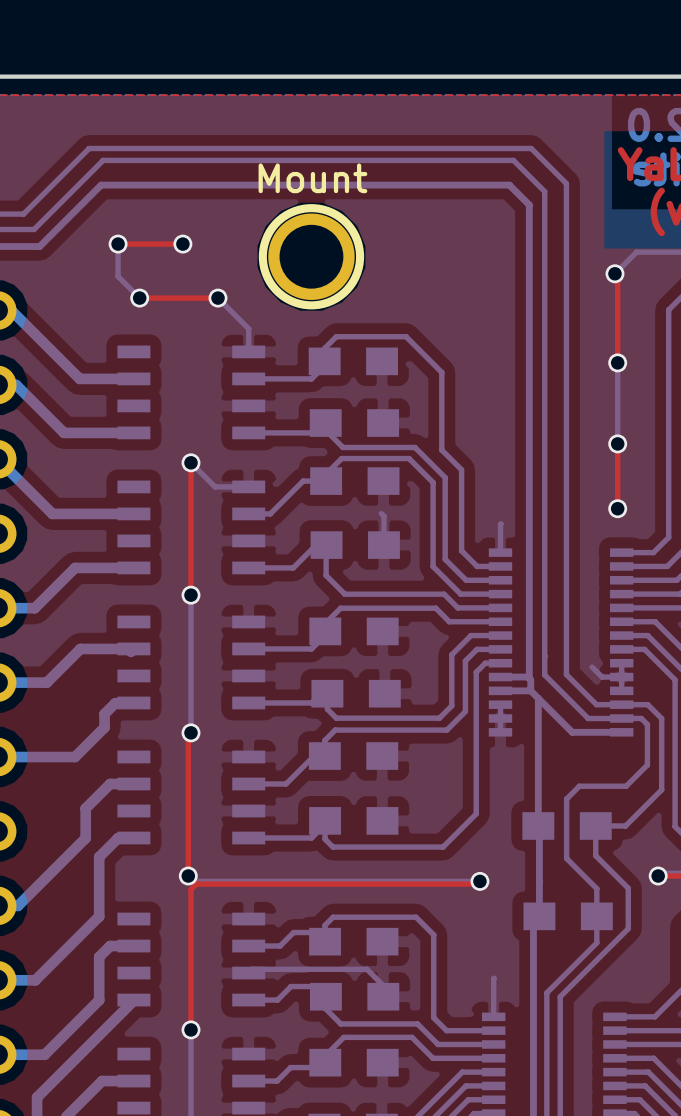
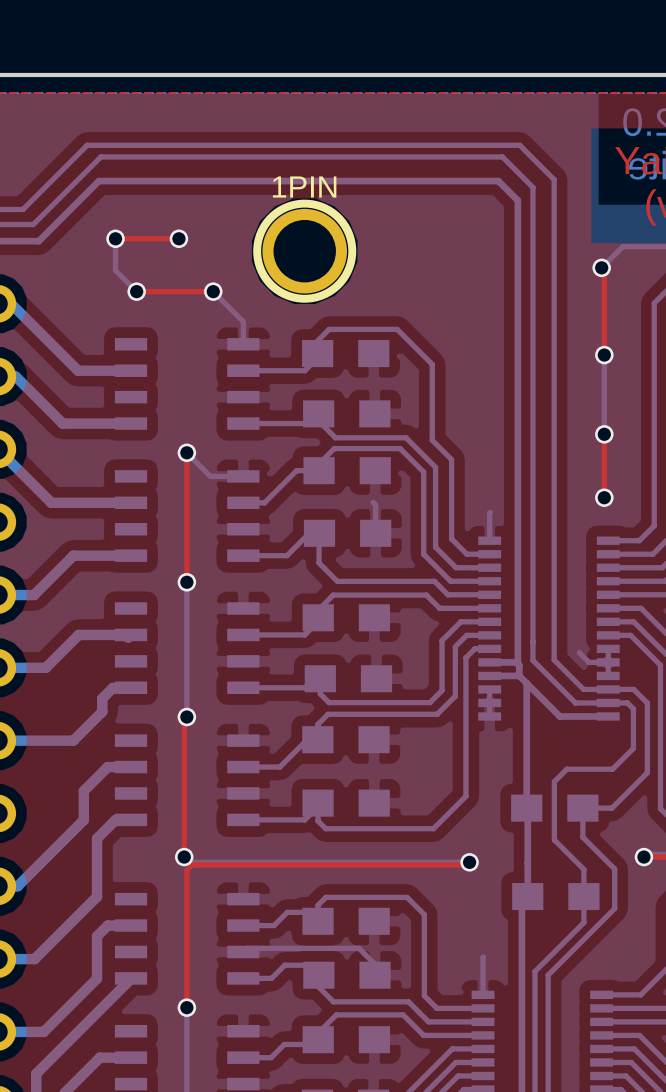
text: Mount (312, 178) -> none
1PIN name: none -> 1PIN (304, 186)

